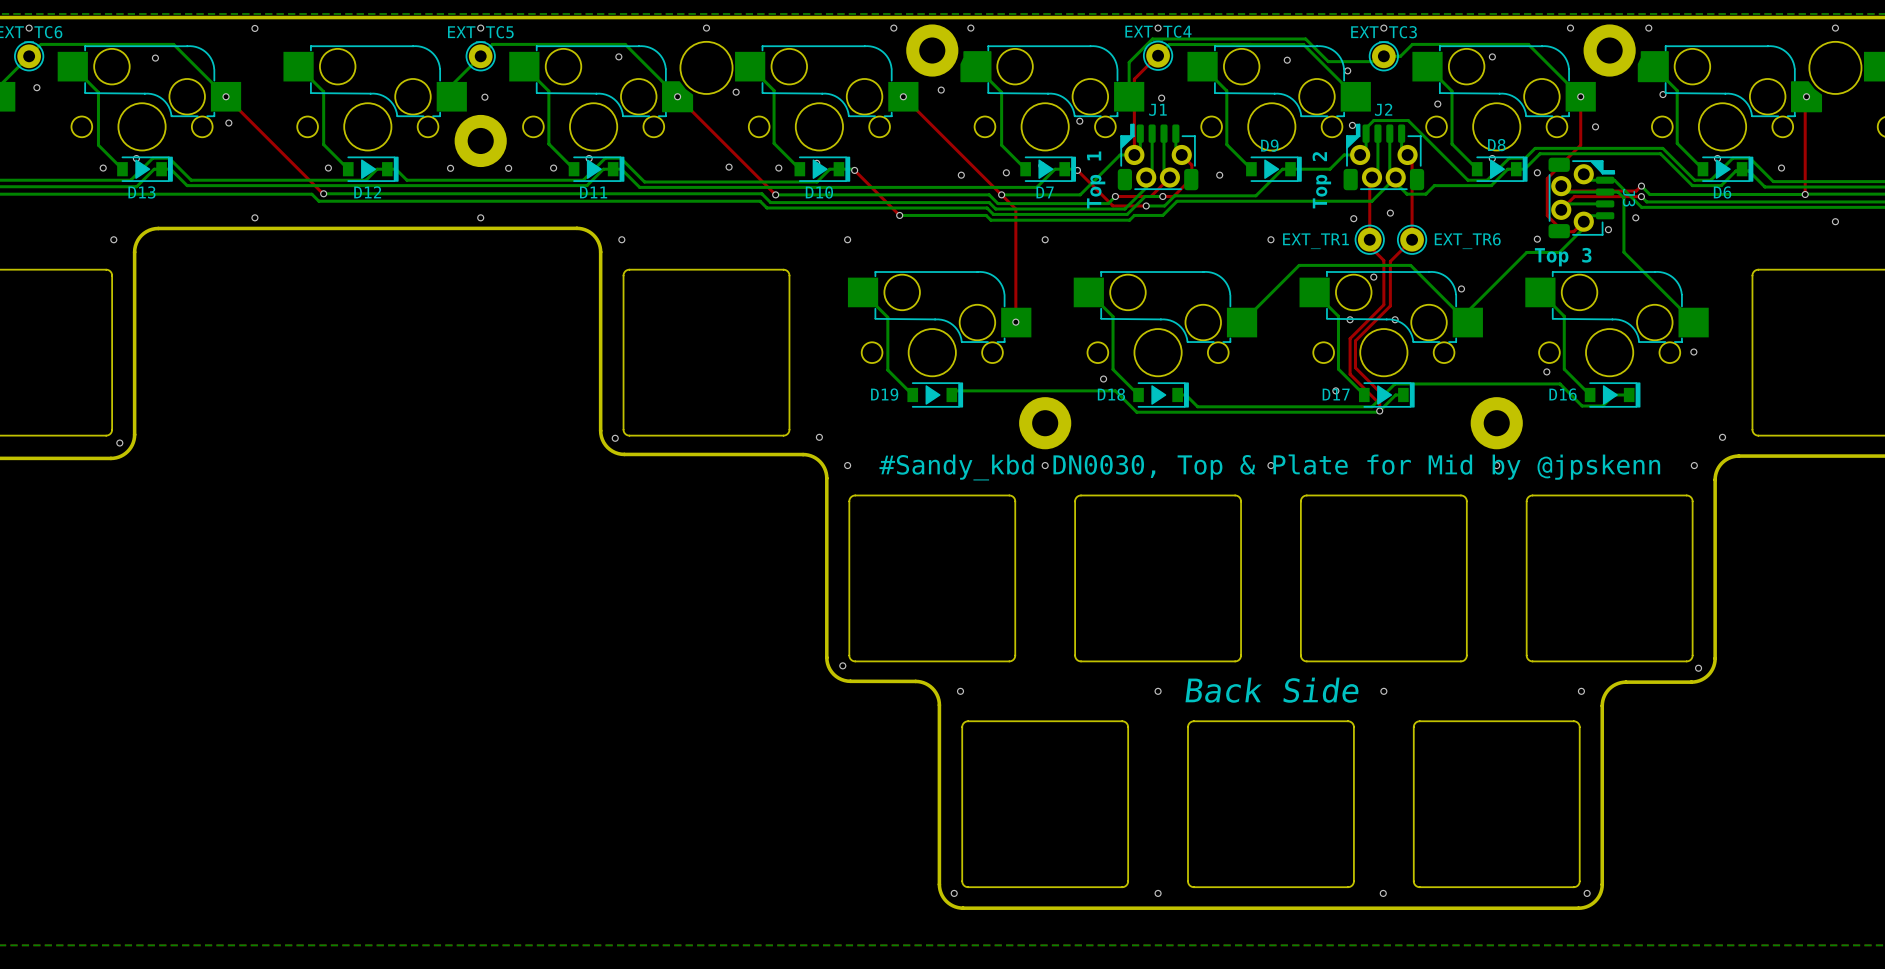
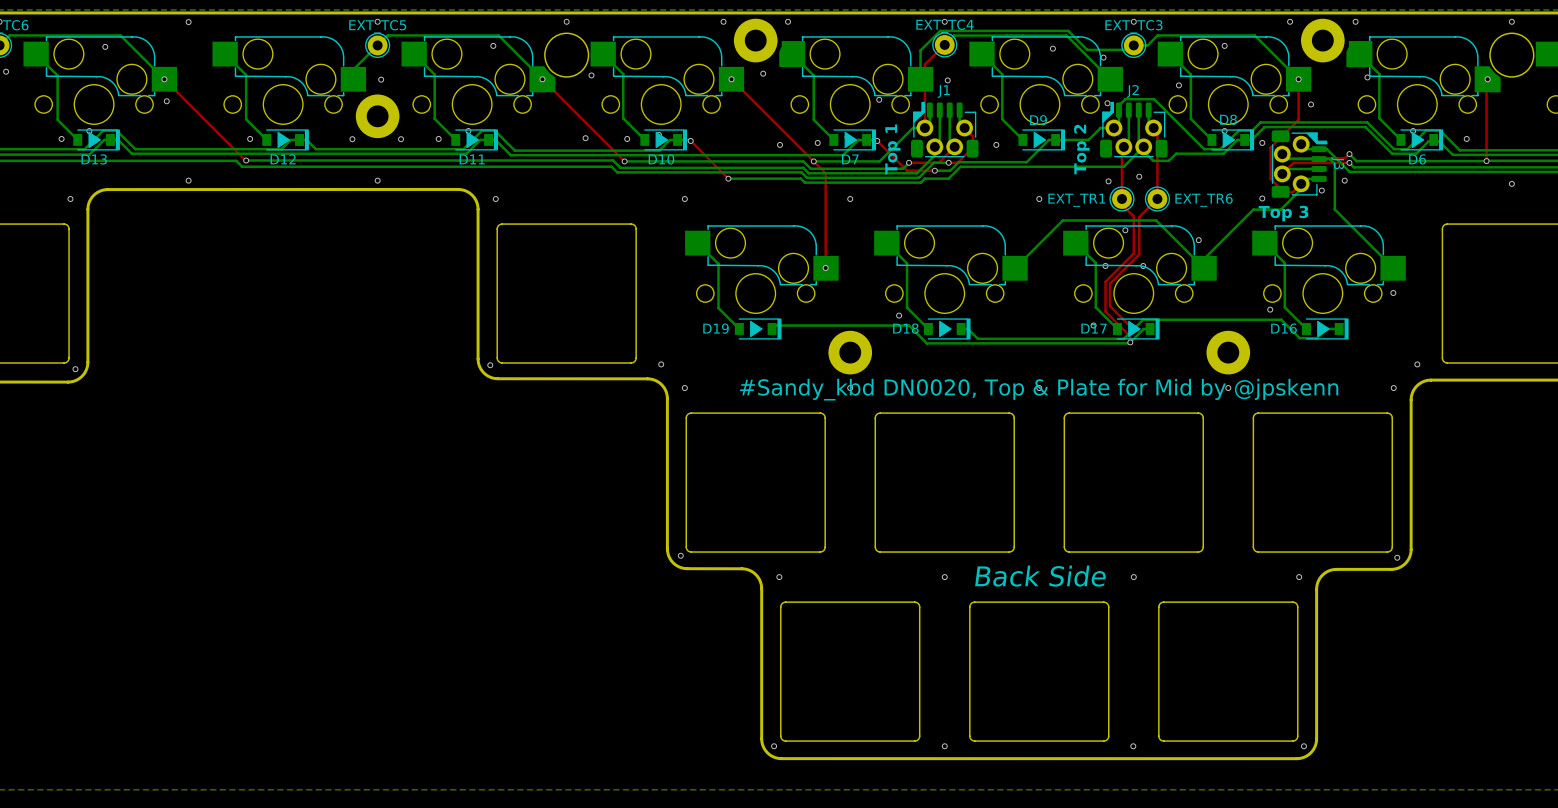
text: #Sandy_kbd DN0030, Top & Plate for Mid by @jpskenn (1269, 467) -> #Sandy_kbd DN0020, Top & Plate for Mid by @jpskenn (1039, 389)

